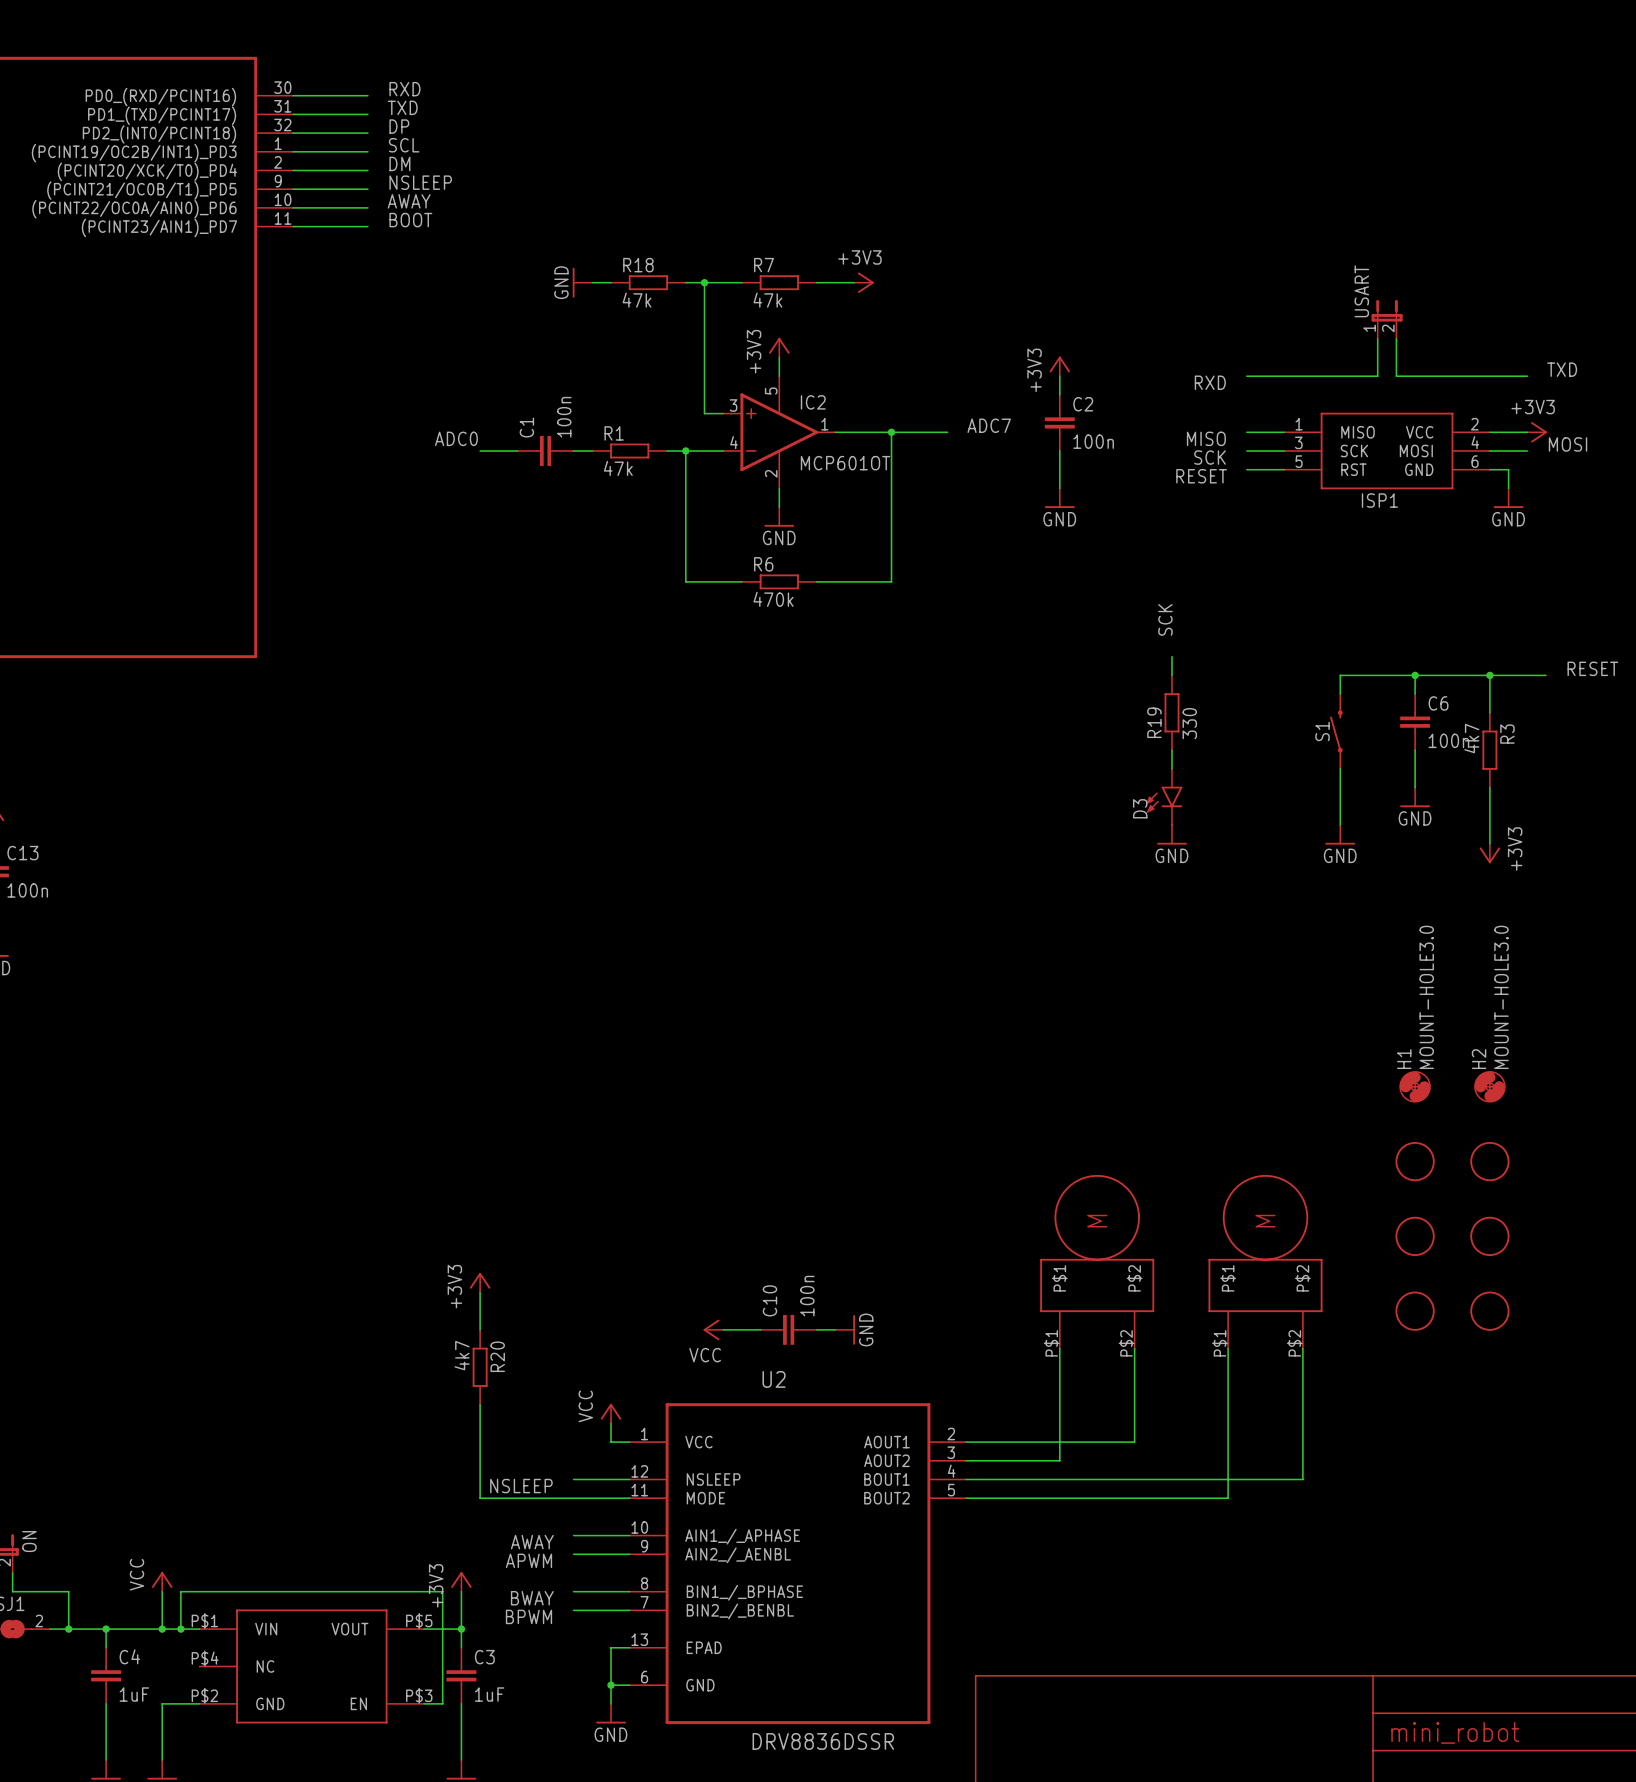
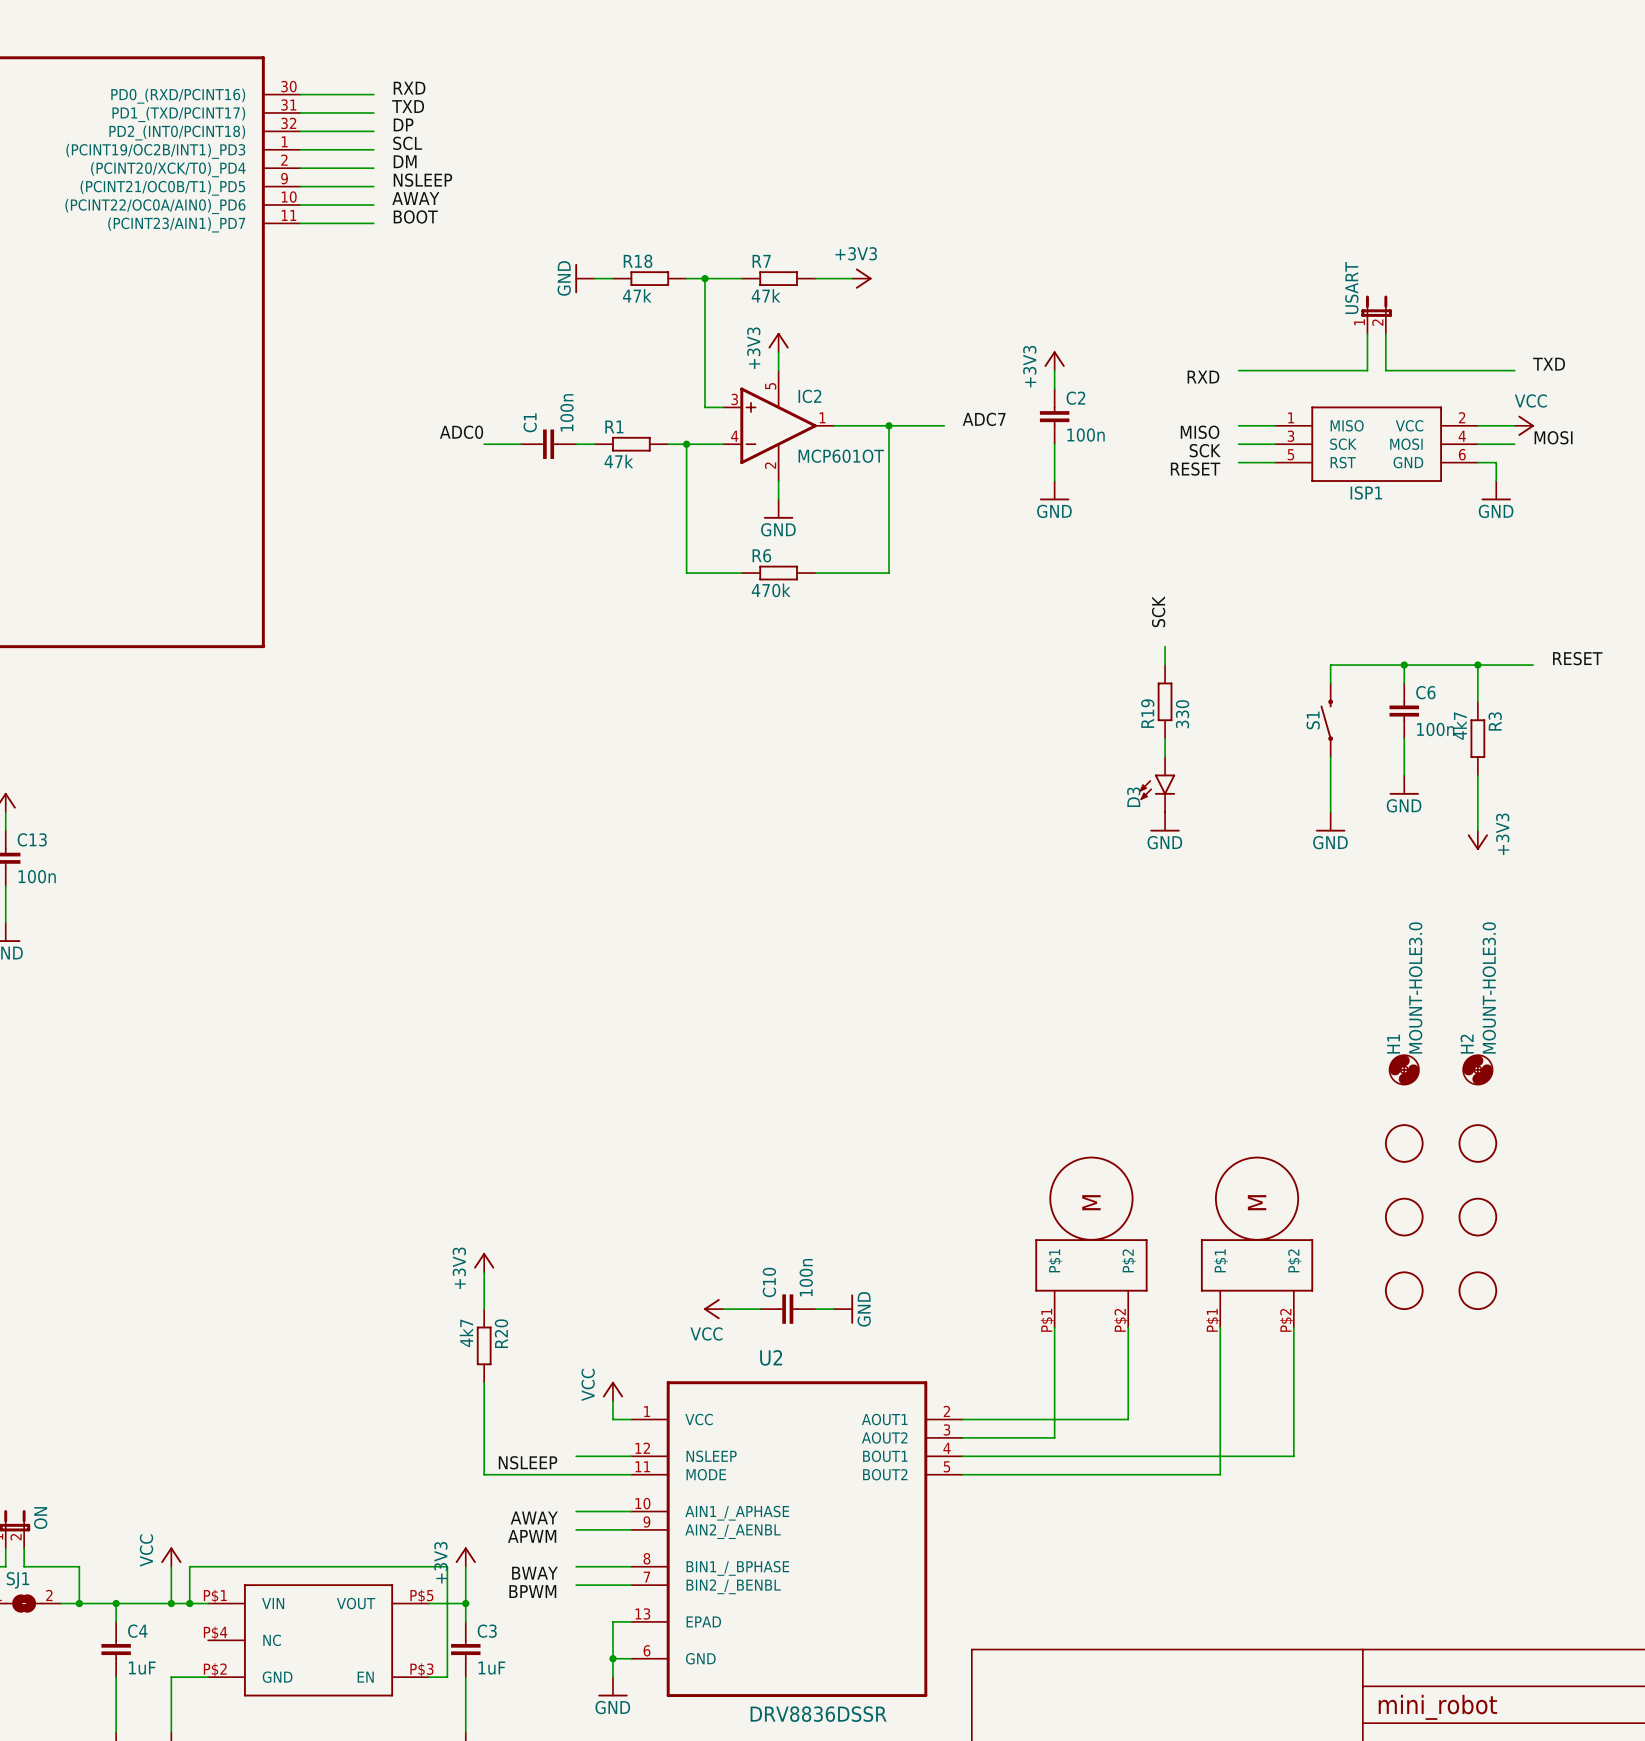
power symbol: +3V3 (1537, 432) -> VCC (1524, 425)

